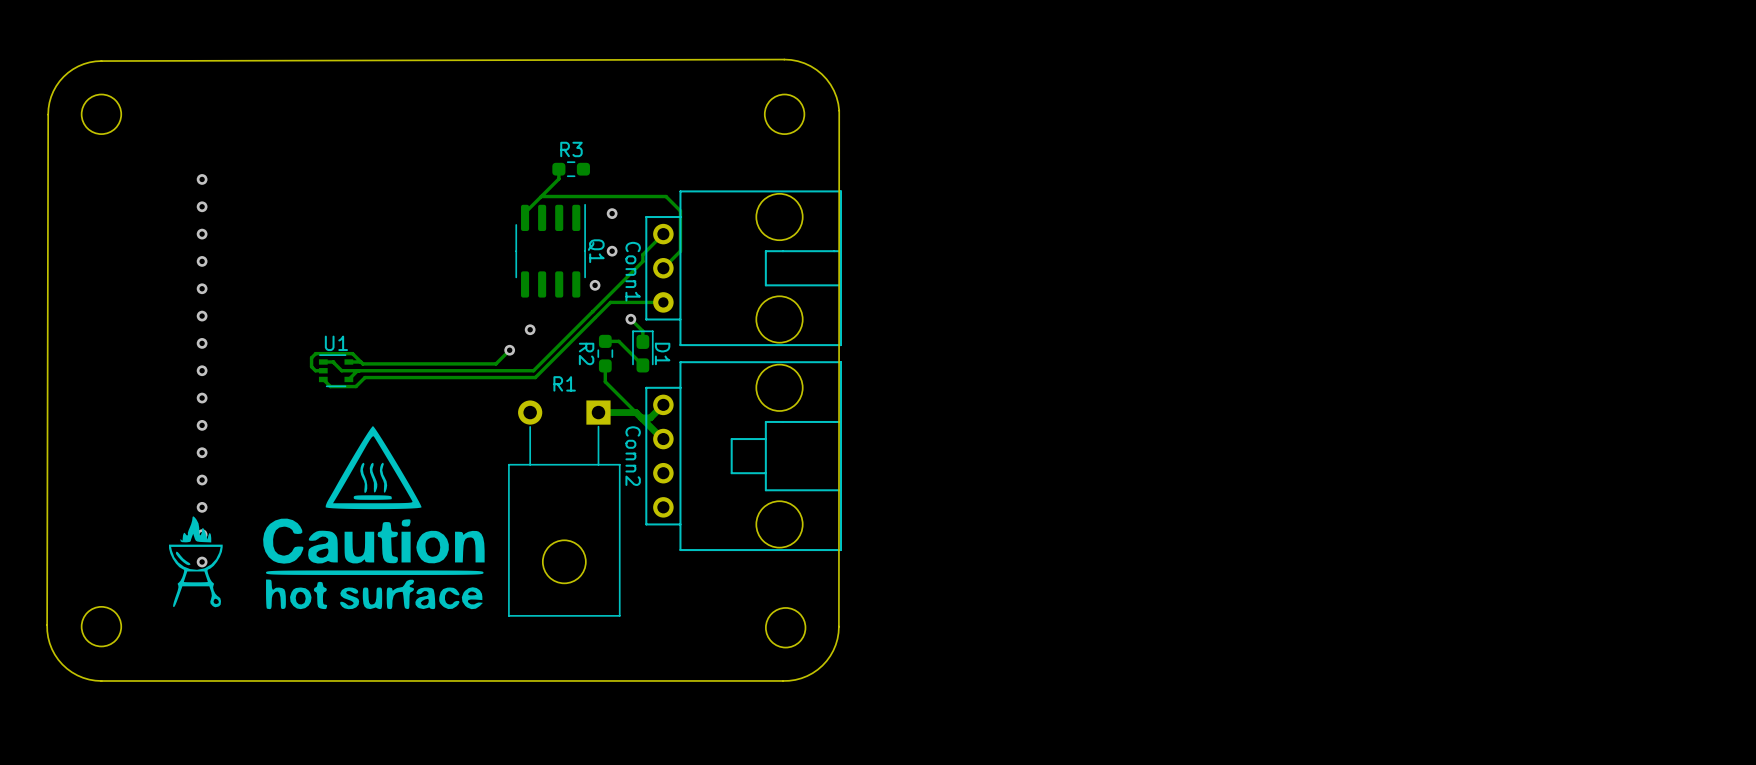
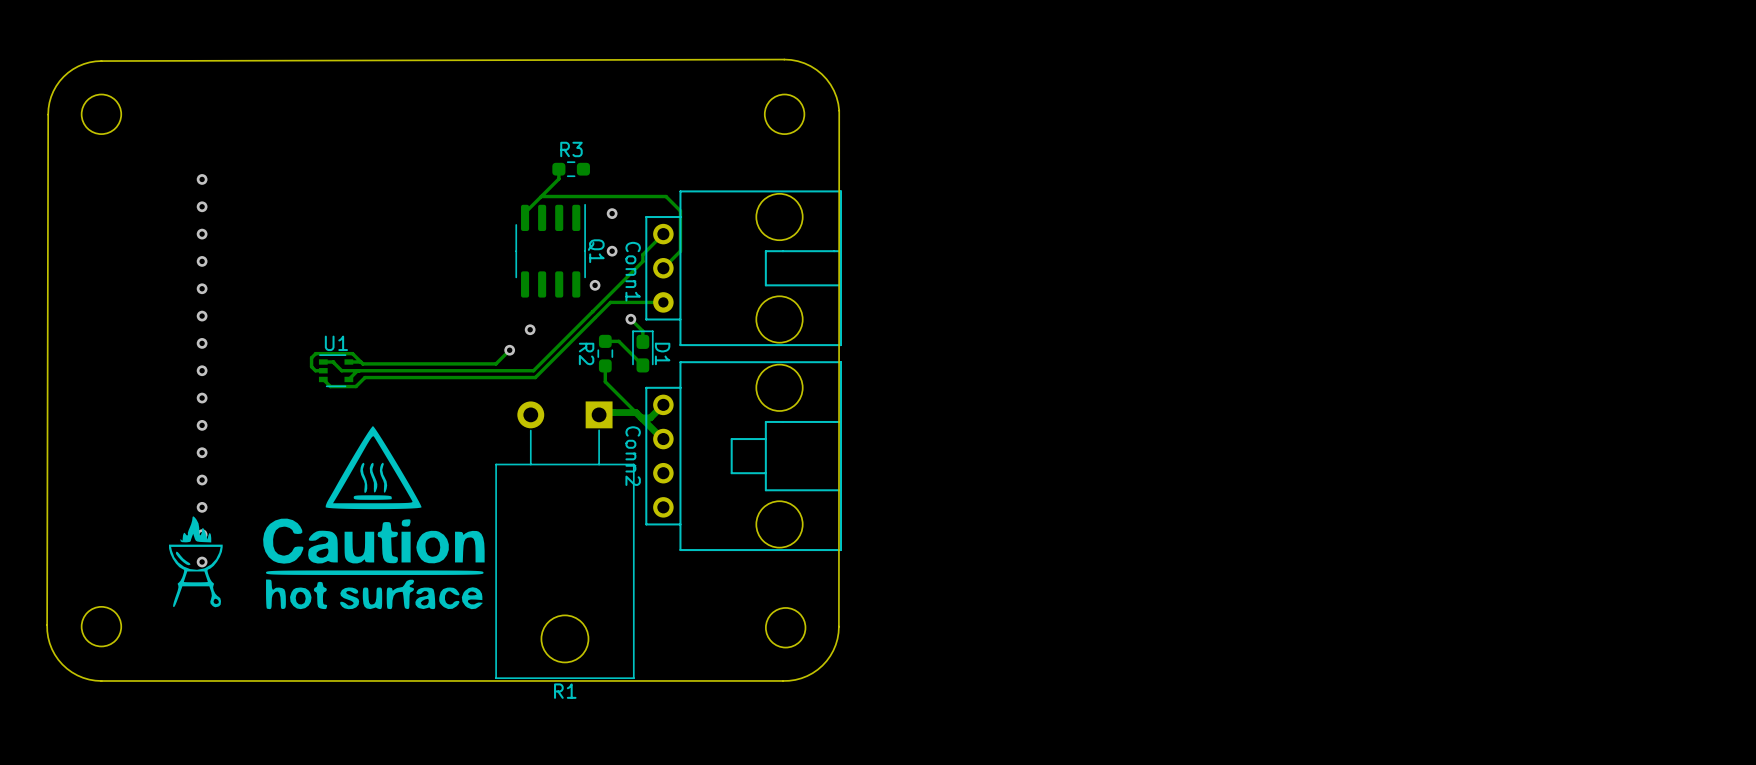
R1 name position: R1 (564, 383) -> R1 (565, 691)
R1 footprint: [508, 400, 621, 617] -> [495, 401, 635, 679]

